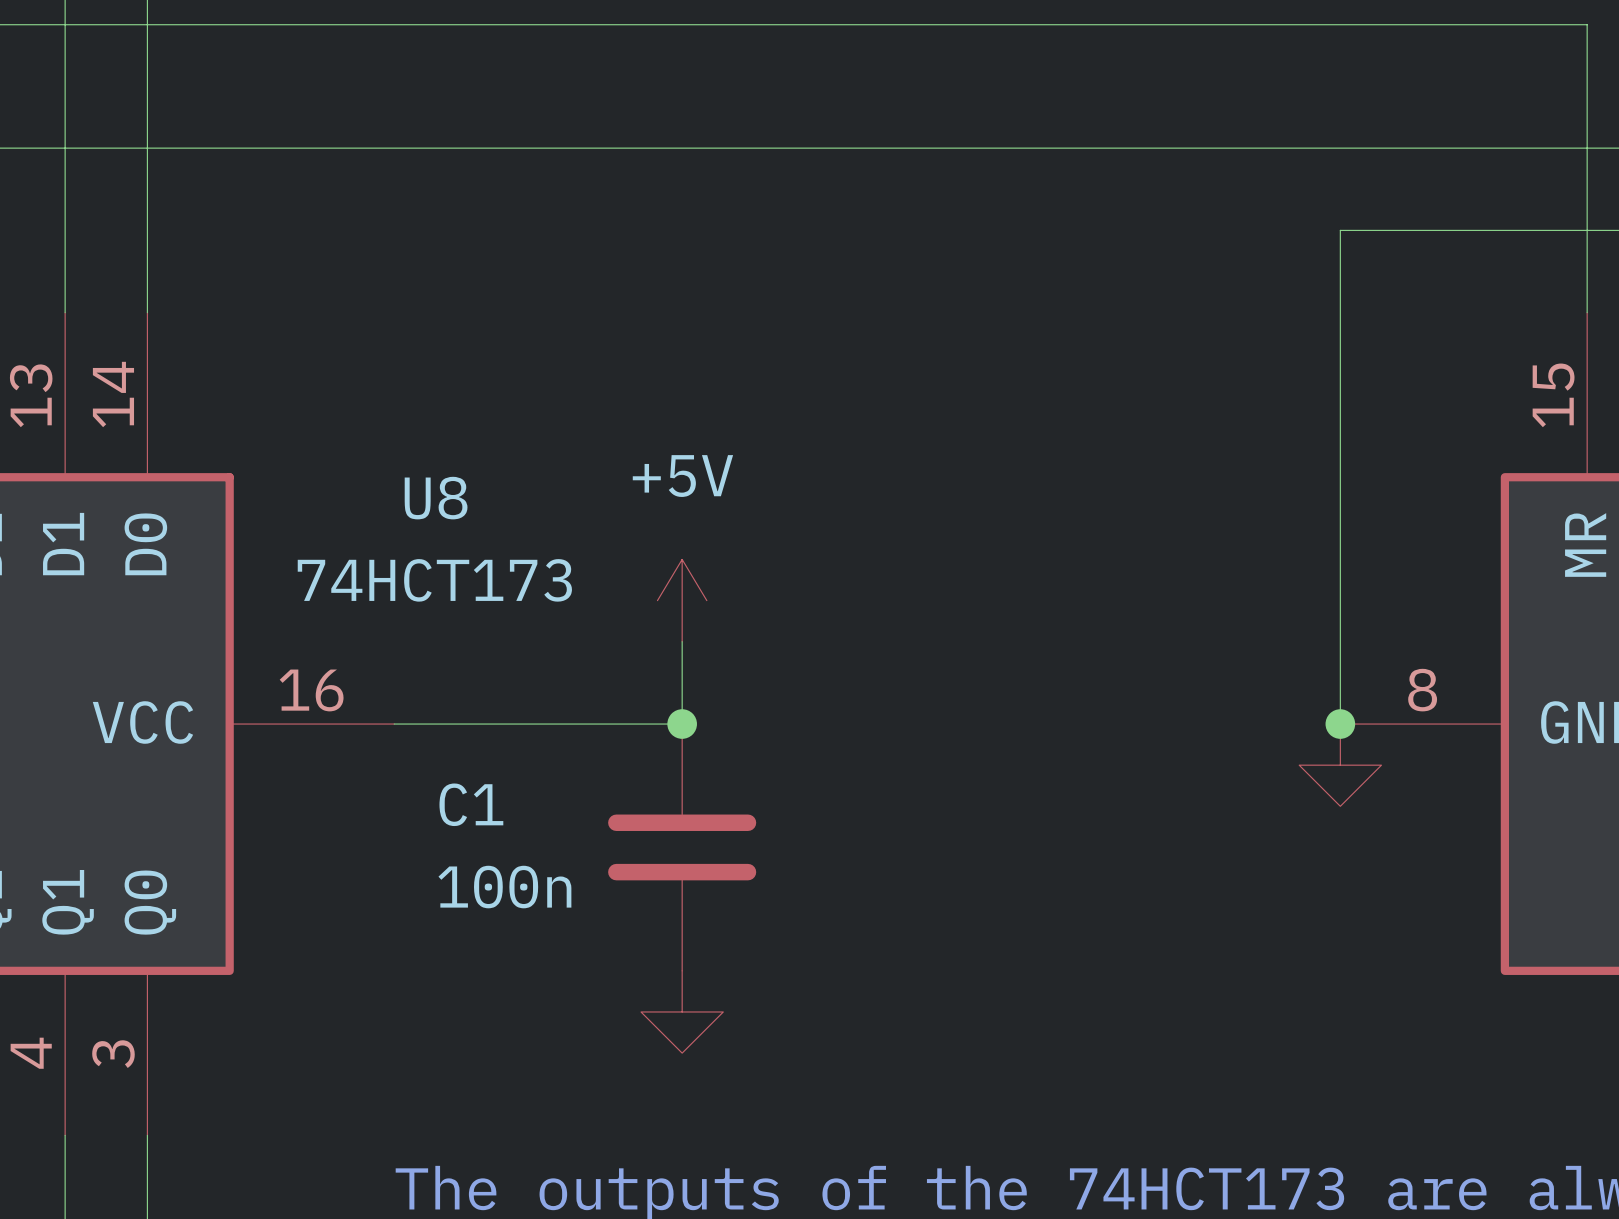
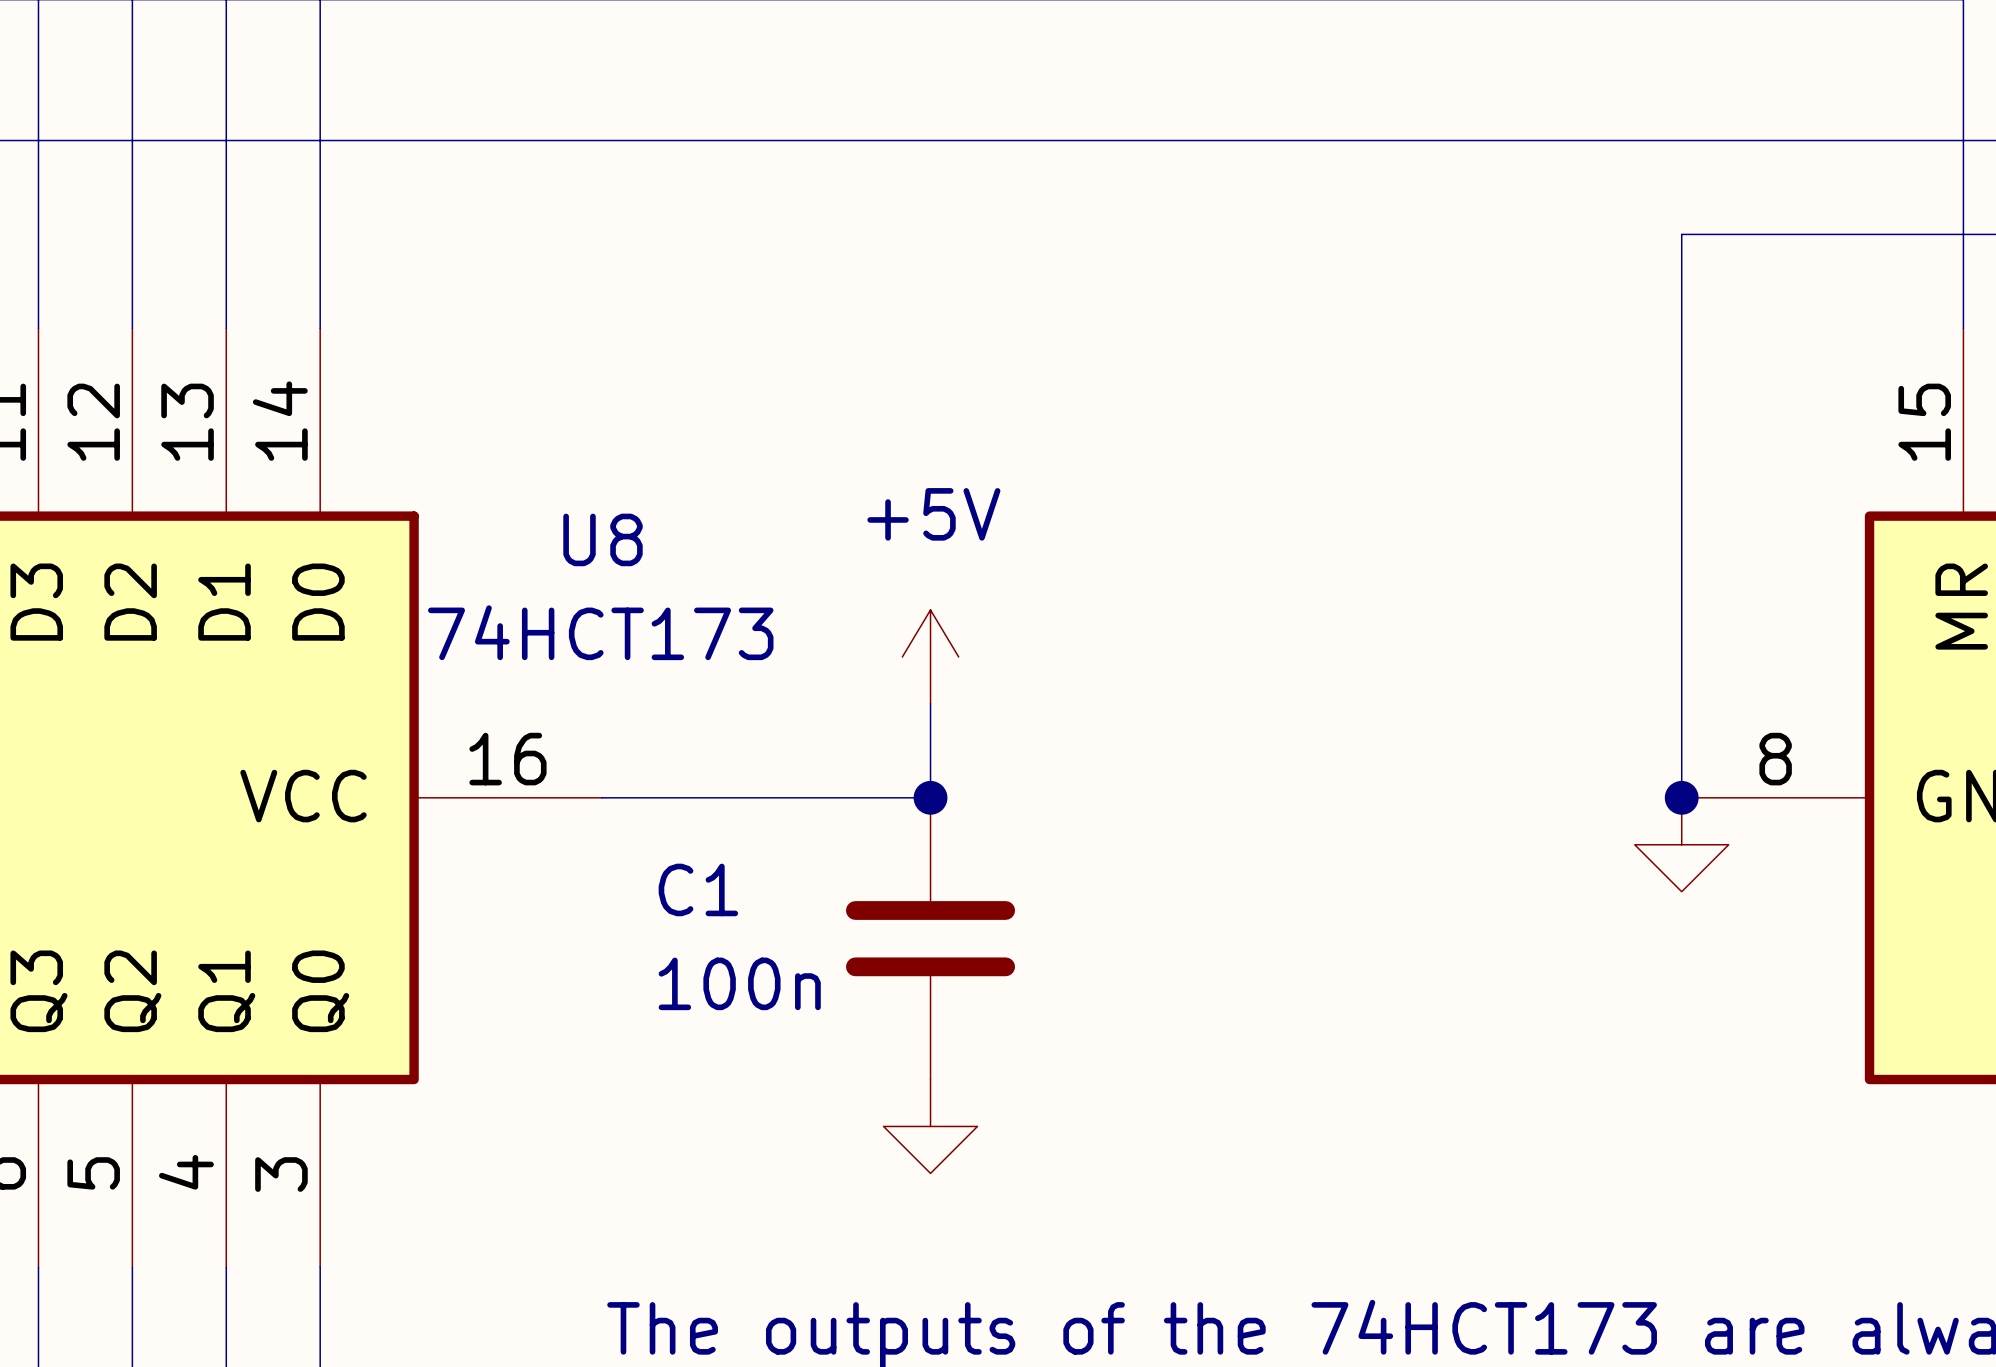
U8 name position: U8 (436, 498) -> U8 (602, 539)
U8 value position: 74HCT173 (434, 580) -> 74HCT173 (600, 632)

